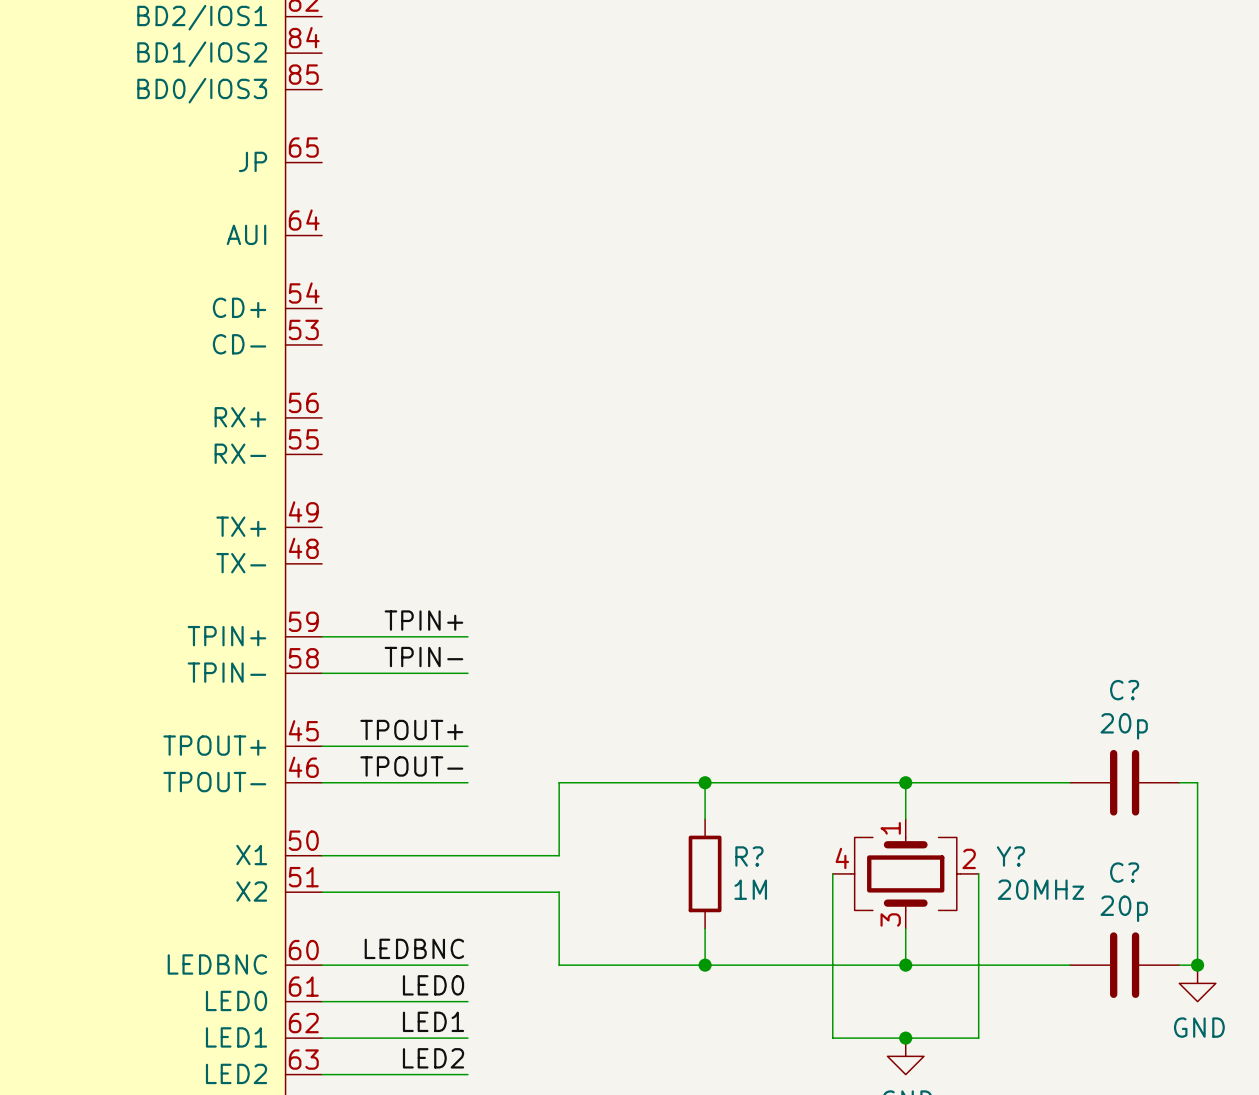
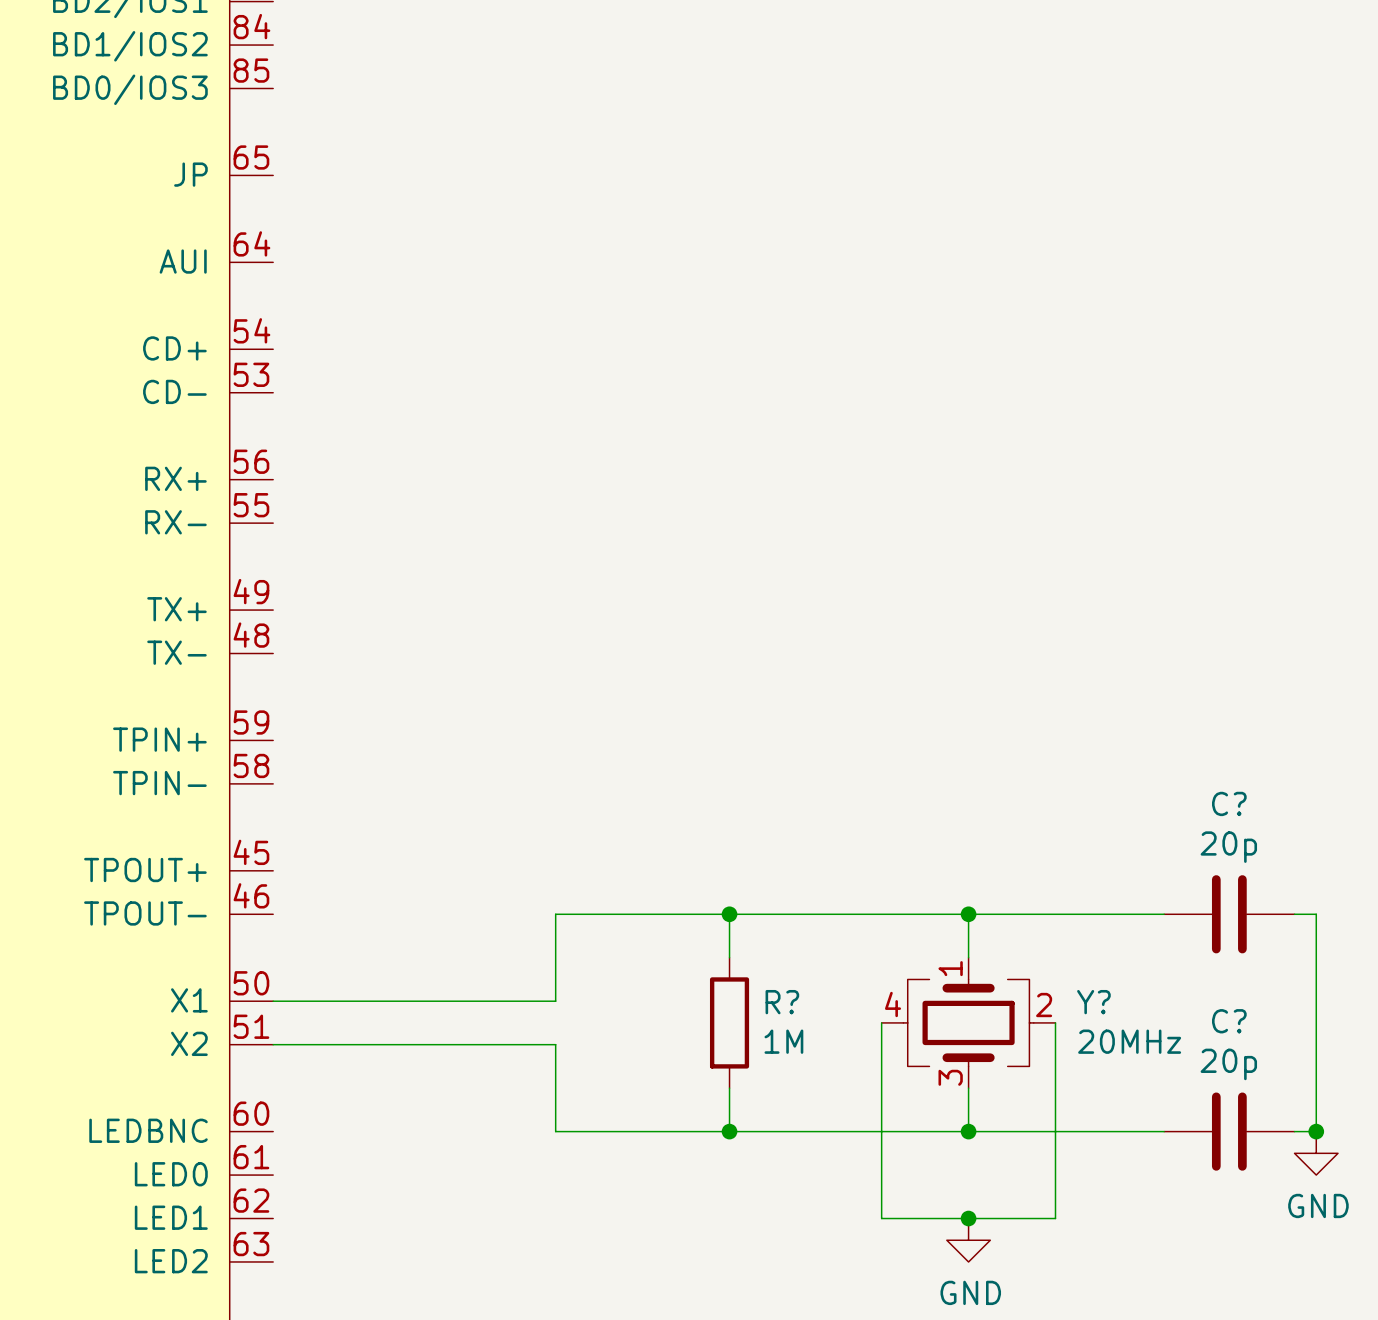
label: TPIN+ (423, 620) -> none
wire: (322, 636) (467, 636) -> none
label: TPIN- (423, 657) -> none
wire: (322, 673) (467, 673) -> none
label: TPOUT+ (411, 729) -> none
wire: (322, 746) (467, 746) -> none
label: TPOUT- (411, 766) -> none
wire: (322, 782) (467, 782) -> none
label: LEDBNC (414, 948) -> none
wire: (322, 965) (467, 965) -> none
label: LED0 (433, 985) -> none
wire: (322, 1001) (467, 1001) -> none
label: LED1 (433, 1021) -> none
wire: (322, 1038) (467, 1038) -> none
label: LED2 (433, 1058) -> none
wire: (322, 1074) (467, 1074) -> none

